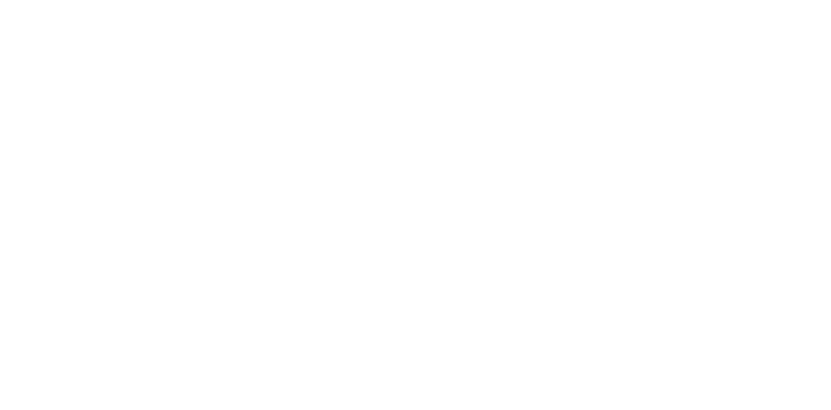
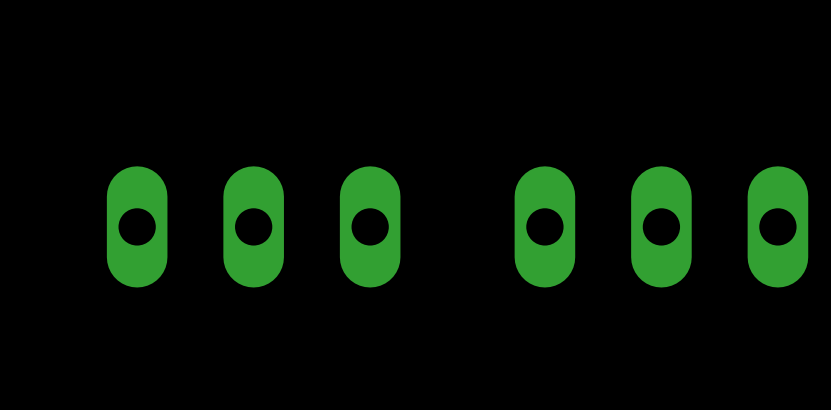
part: none -> (253, 226)
part: none -> (661, 226)

